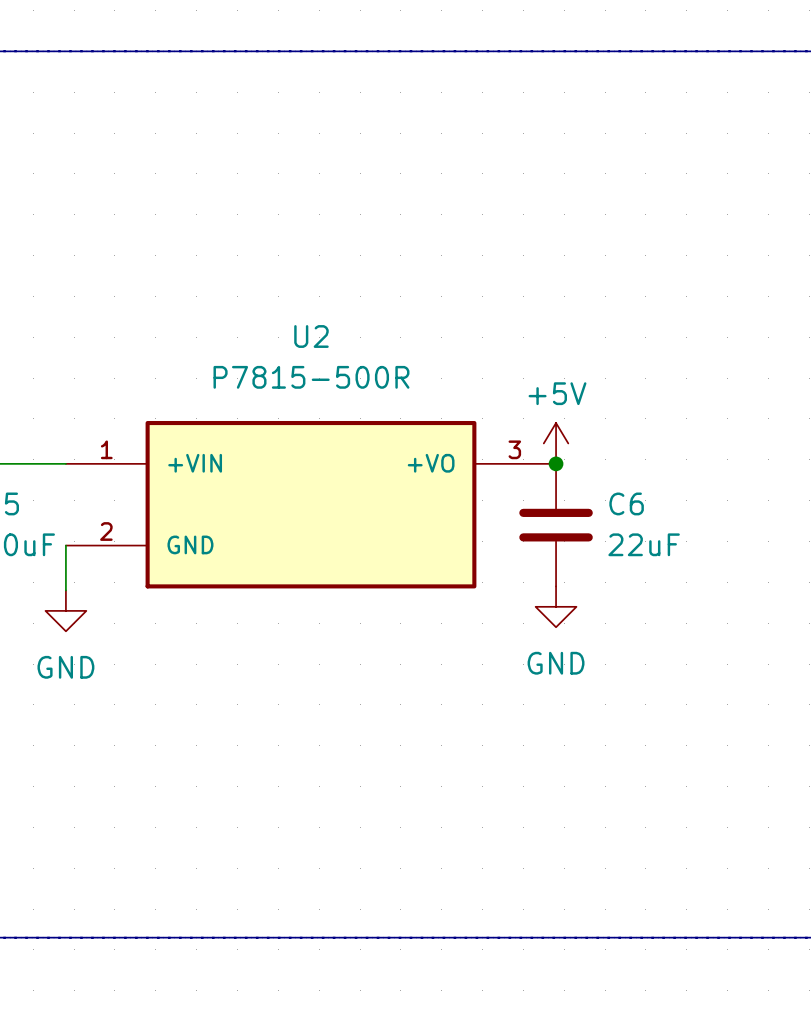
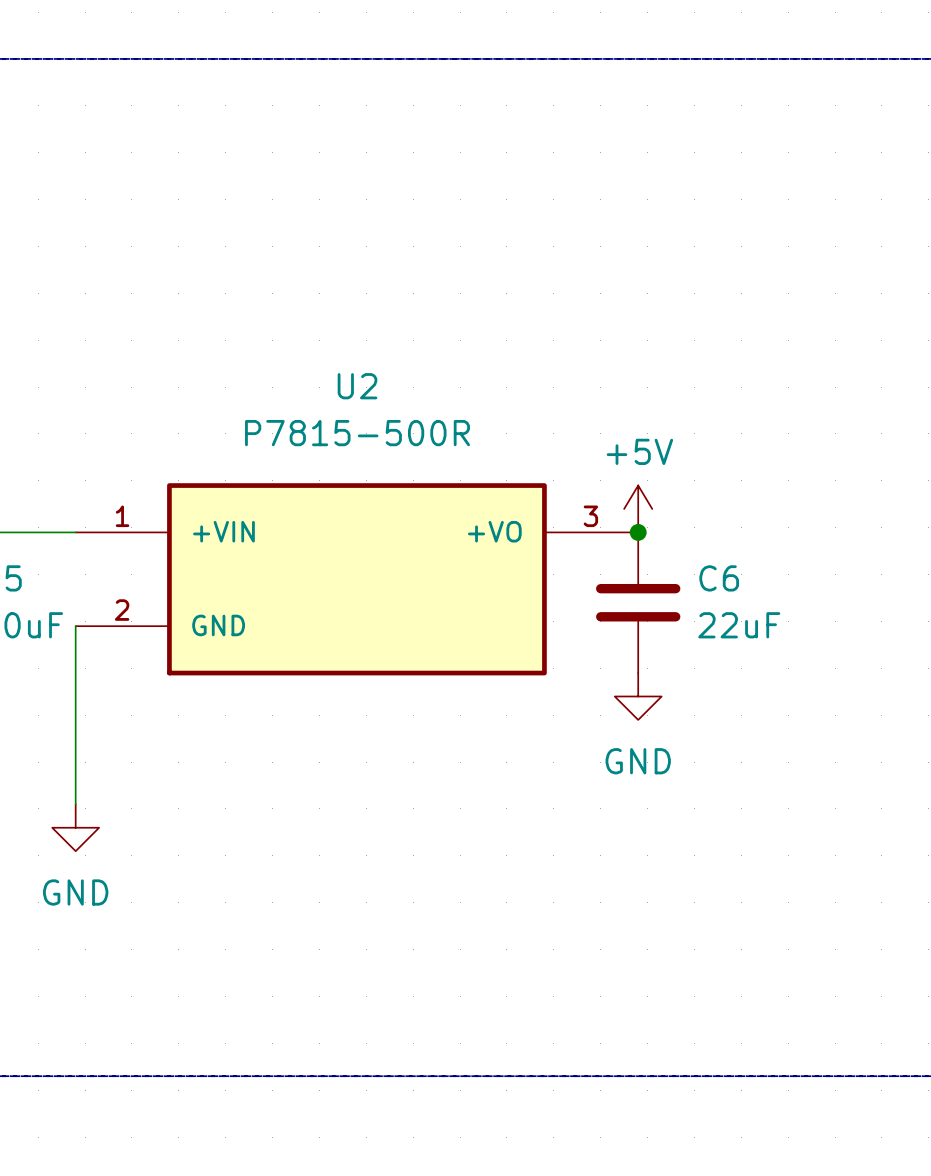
wire: none -> (75, 677) (75, 804)
power symbol position: GND (65, 610) -> GND (75, 827)

